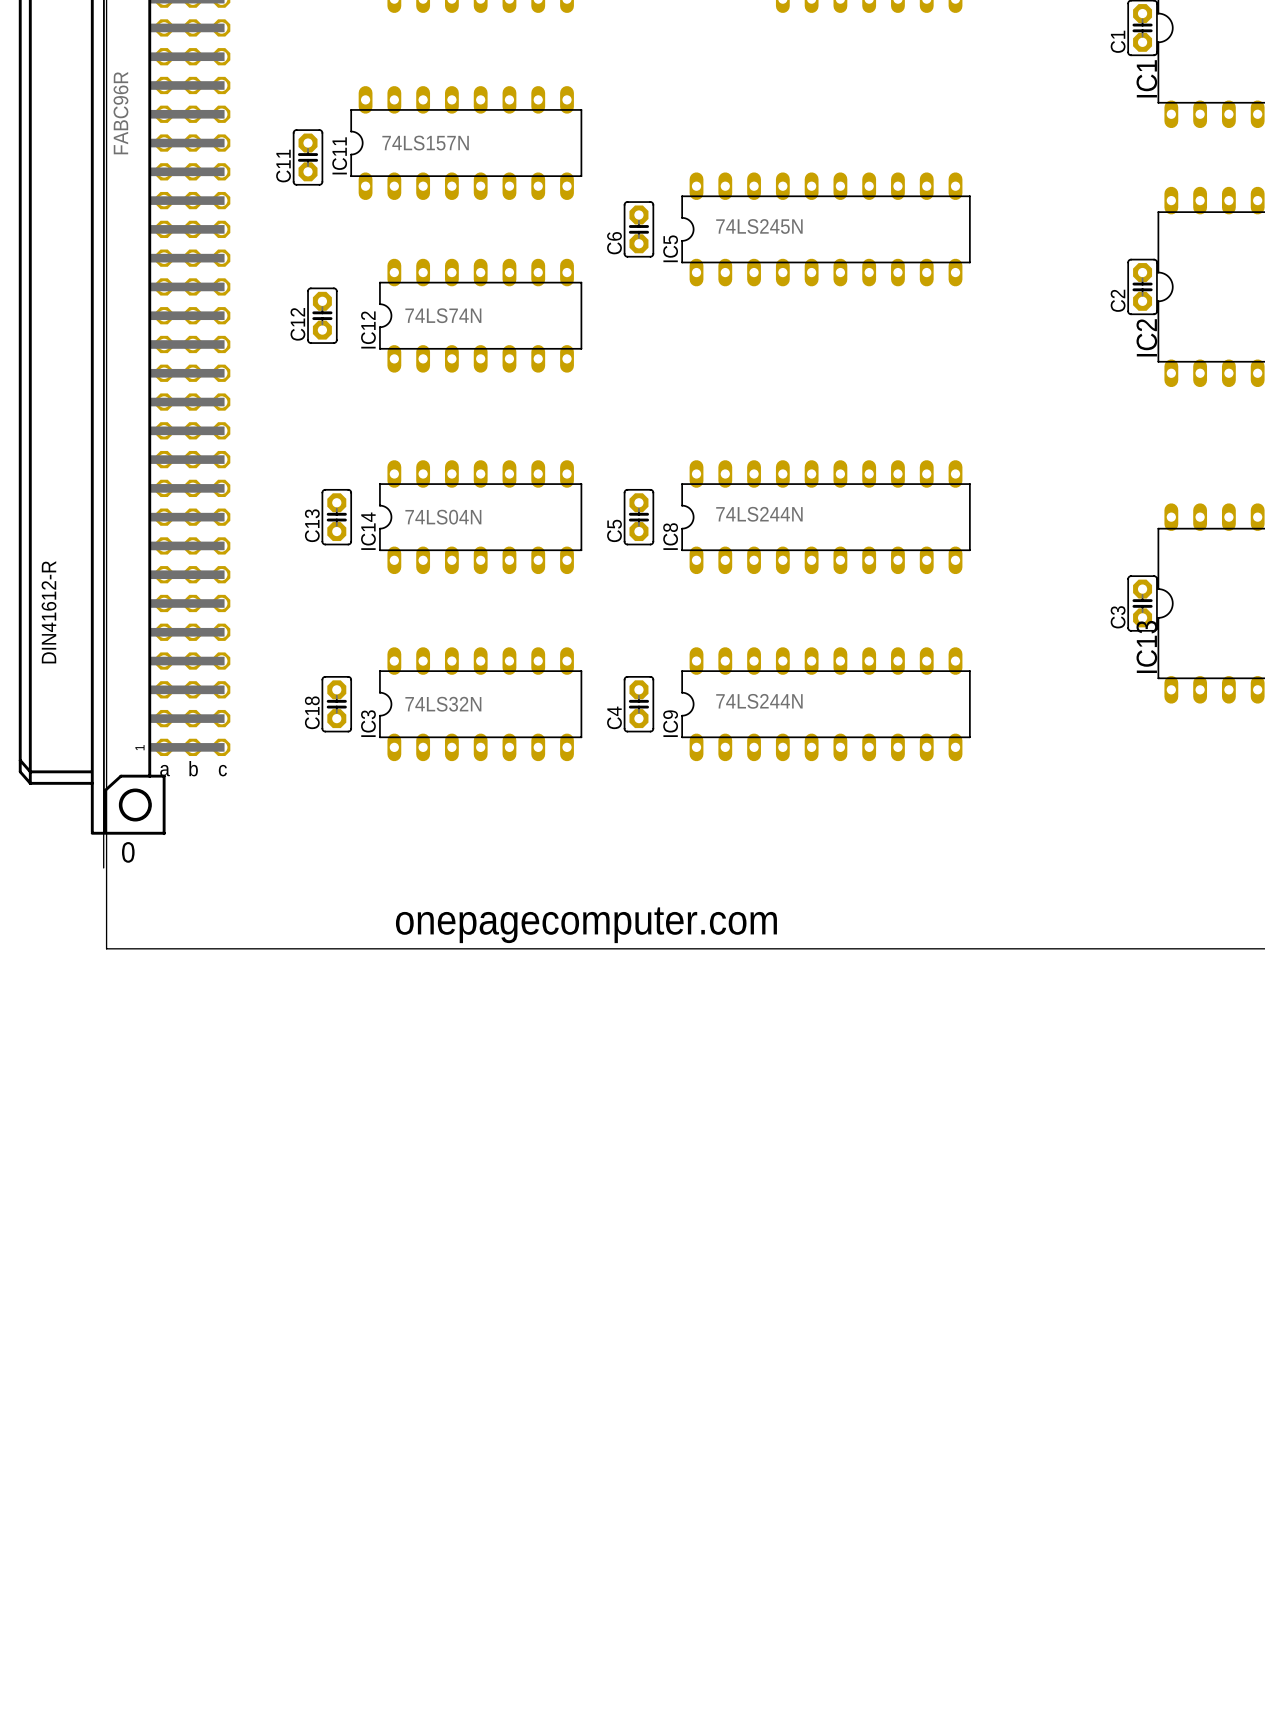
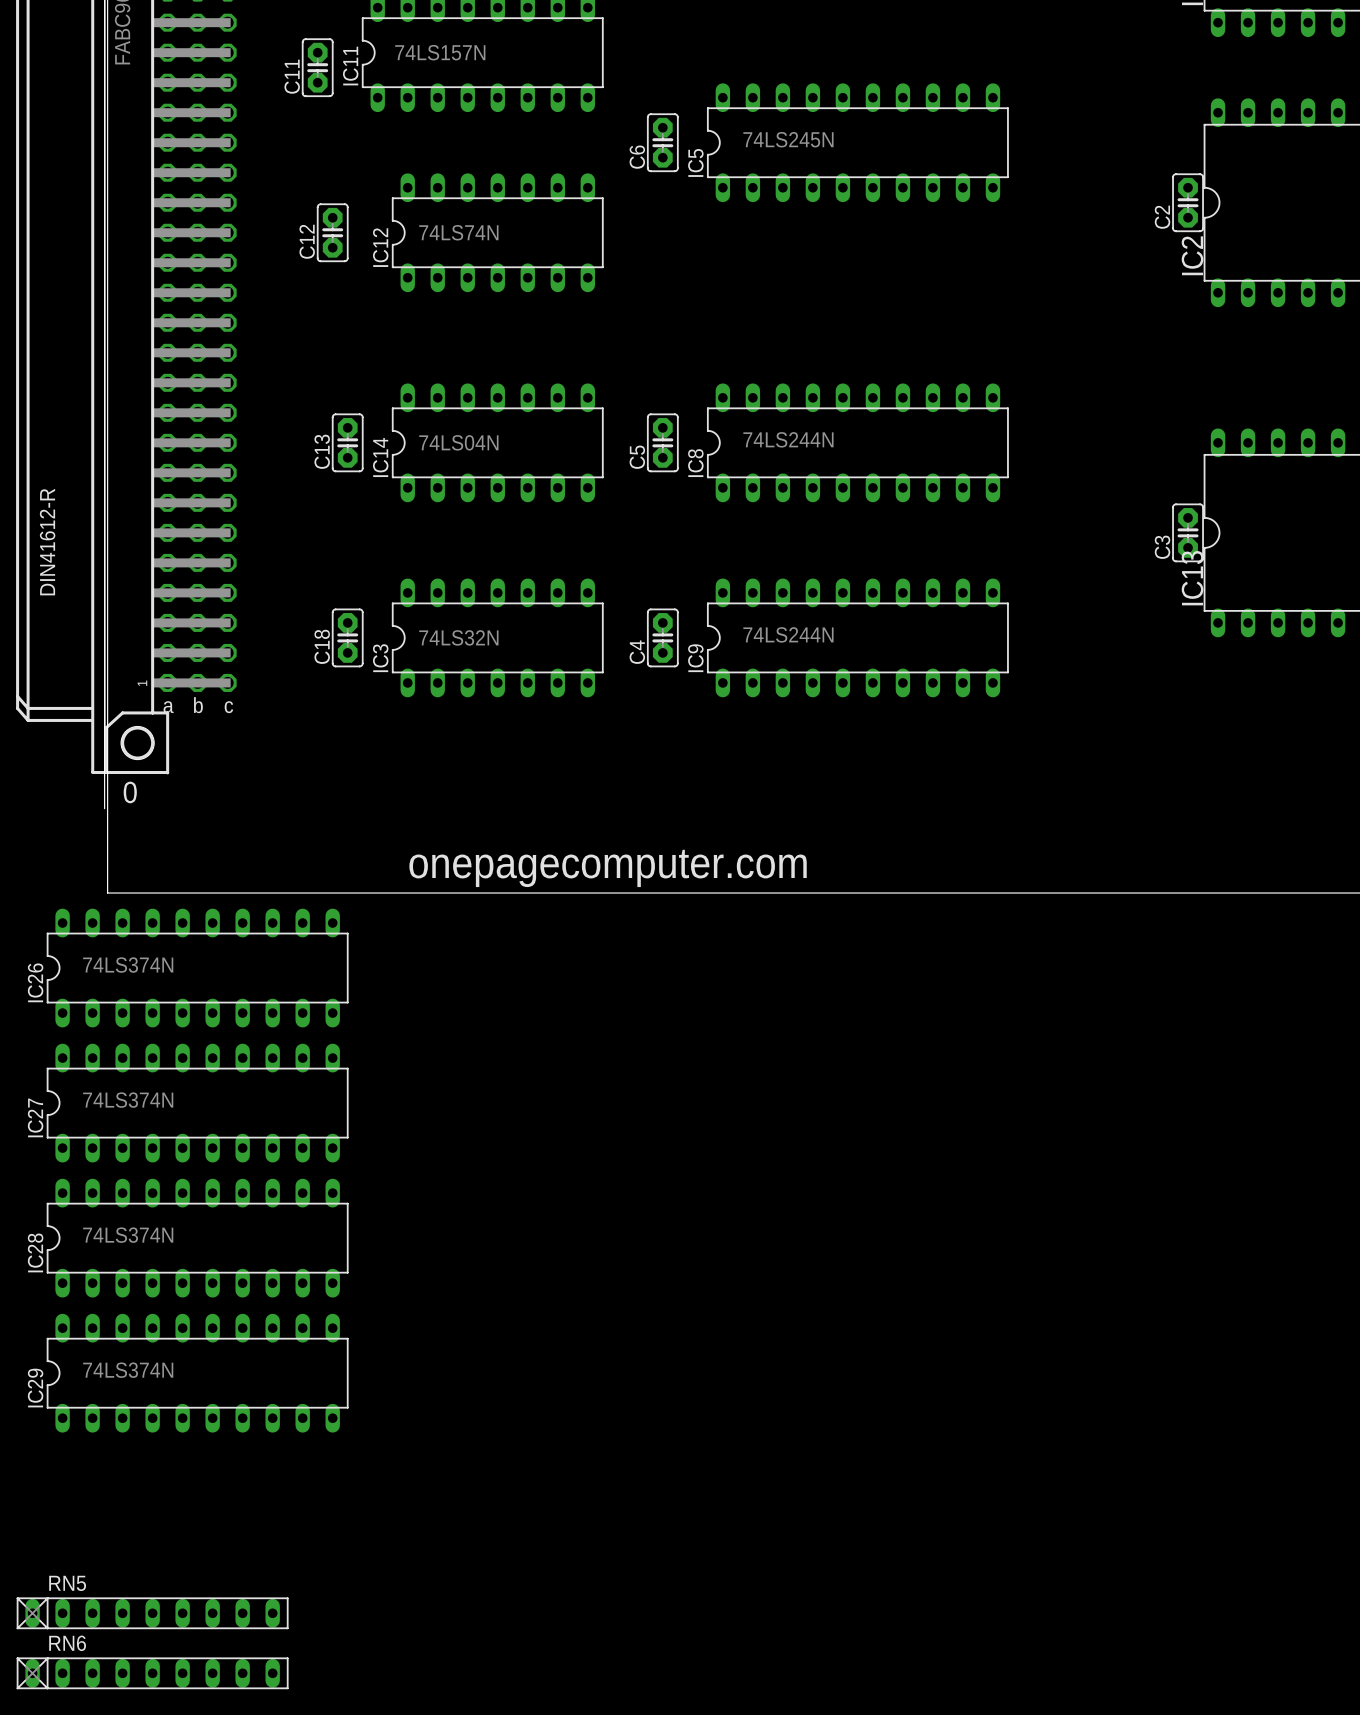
IC26: none -> 74LS374N (197, 968)
IC27: none -> 74LS374N (197, 1103)
IC28: none -> 74LS374N (197, 1238)
IC29: none -> 74LS374N (197, 1373)
RN5: none -> (152, 1613)
RN6: none -> (152, 1673)

